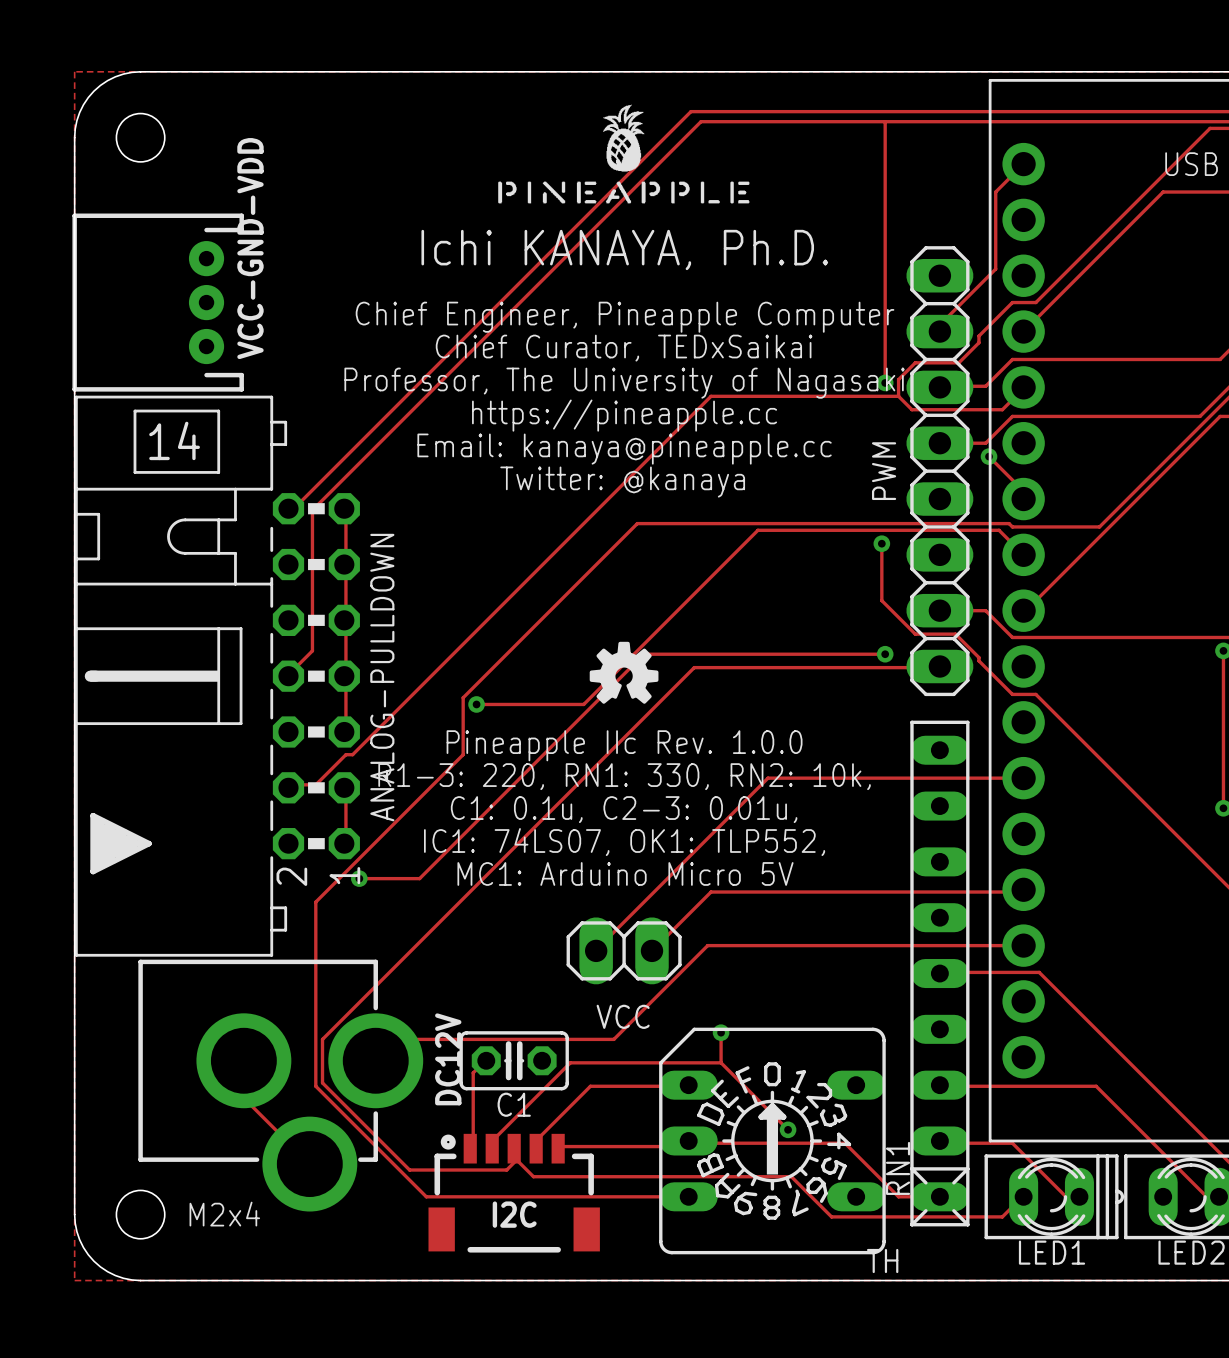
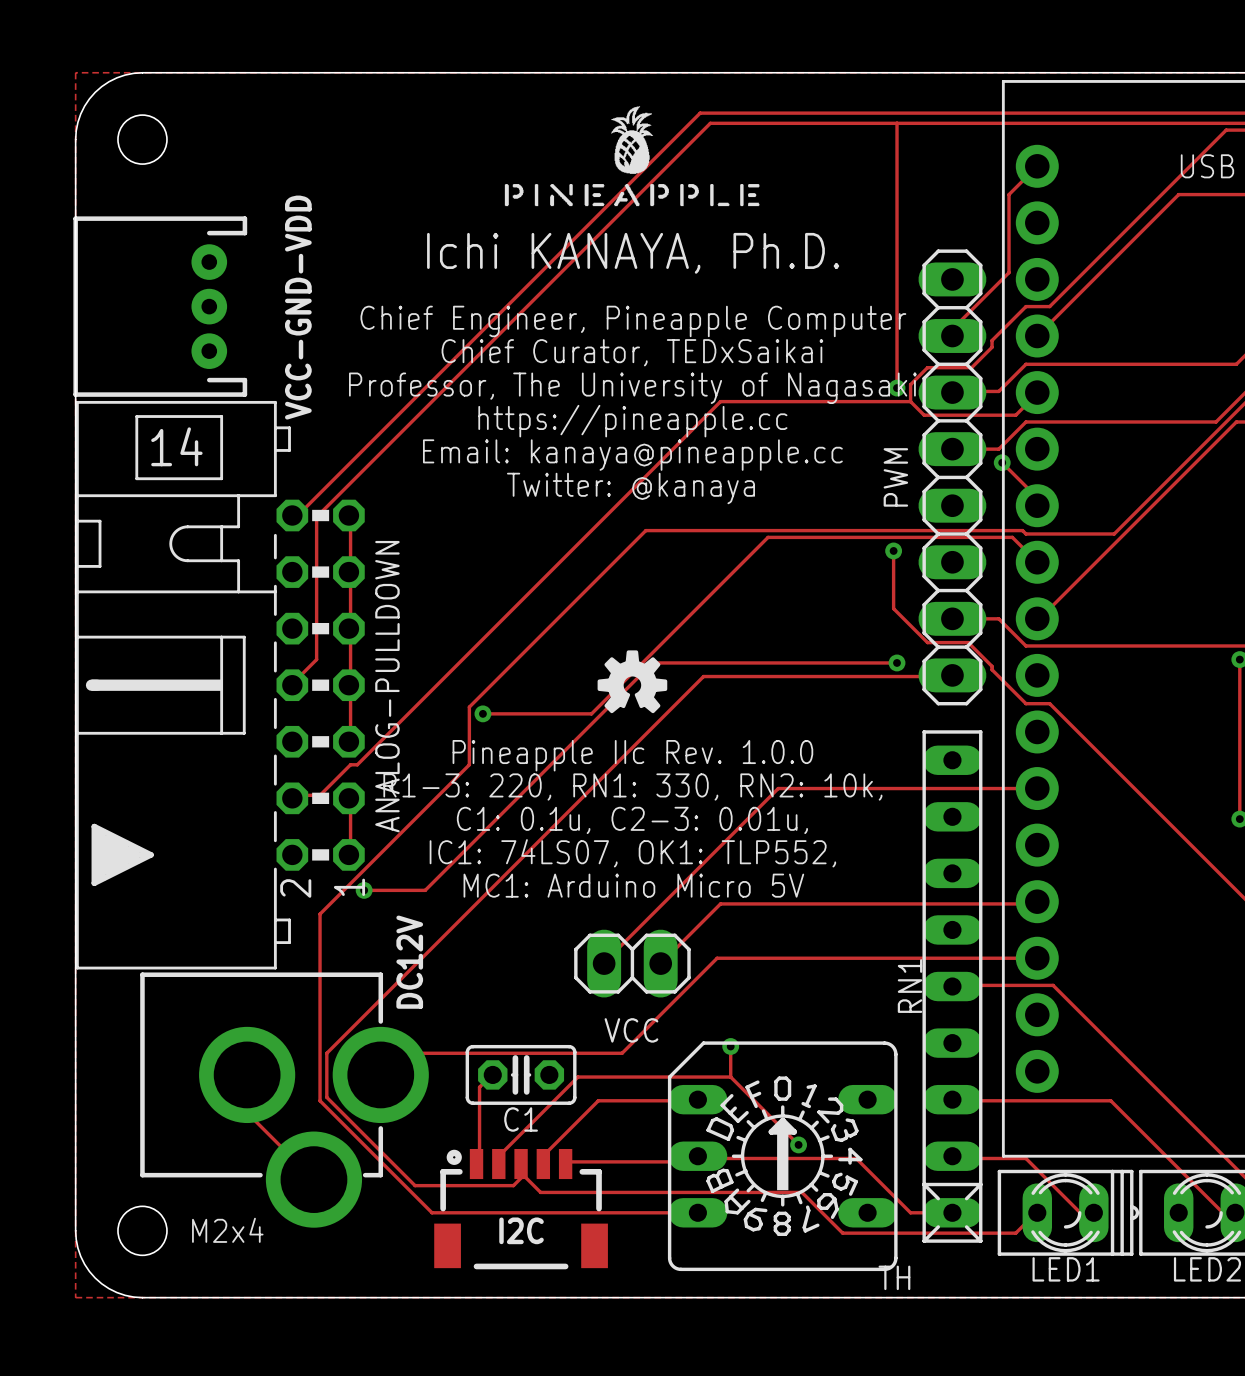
VCC-GND-VDD name position: VCC-GND-VDD (250, 248) -> VCC-GND-VDD (298, 307)
DC12V name position: DC12V (448, 1059) -> DC12V (409, 962)
RN1 name position: RN1 (898, 1168) -> RN1 (910, 986)

